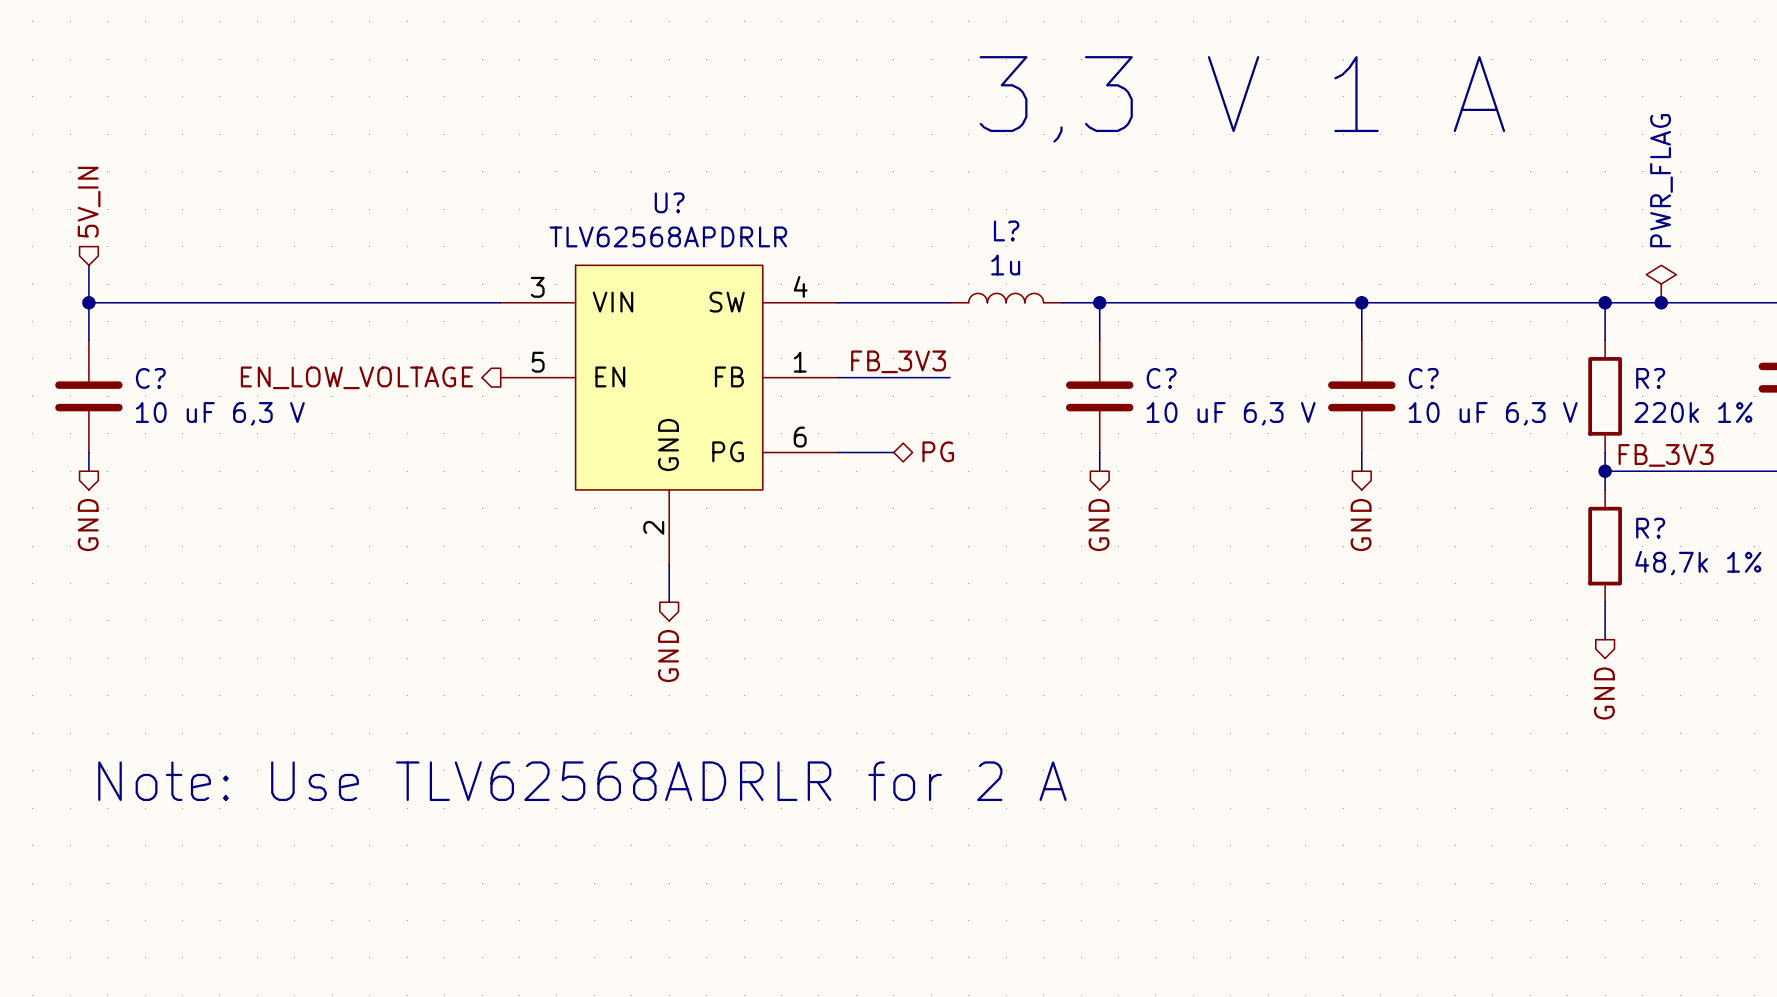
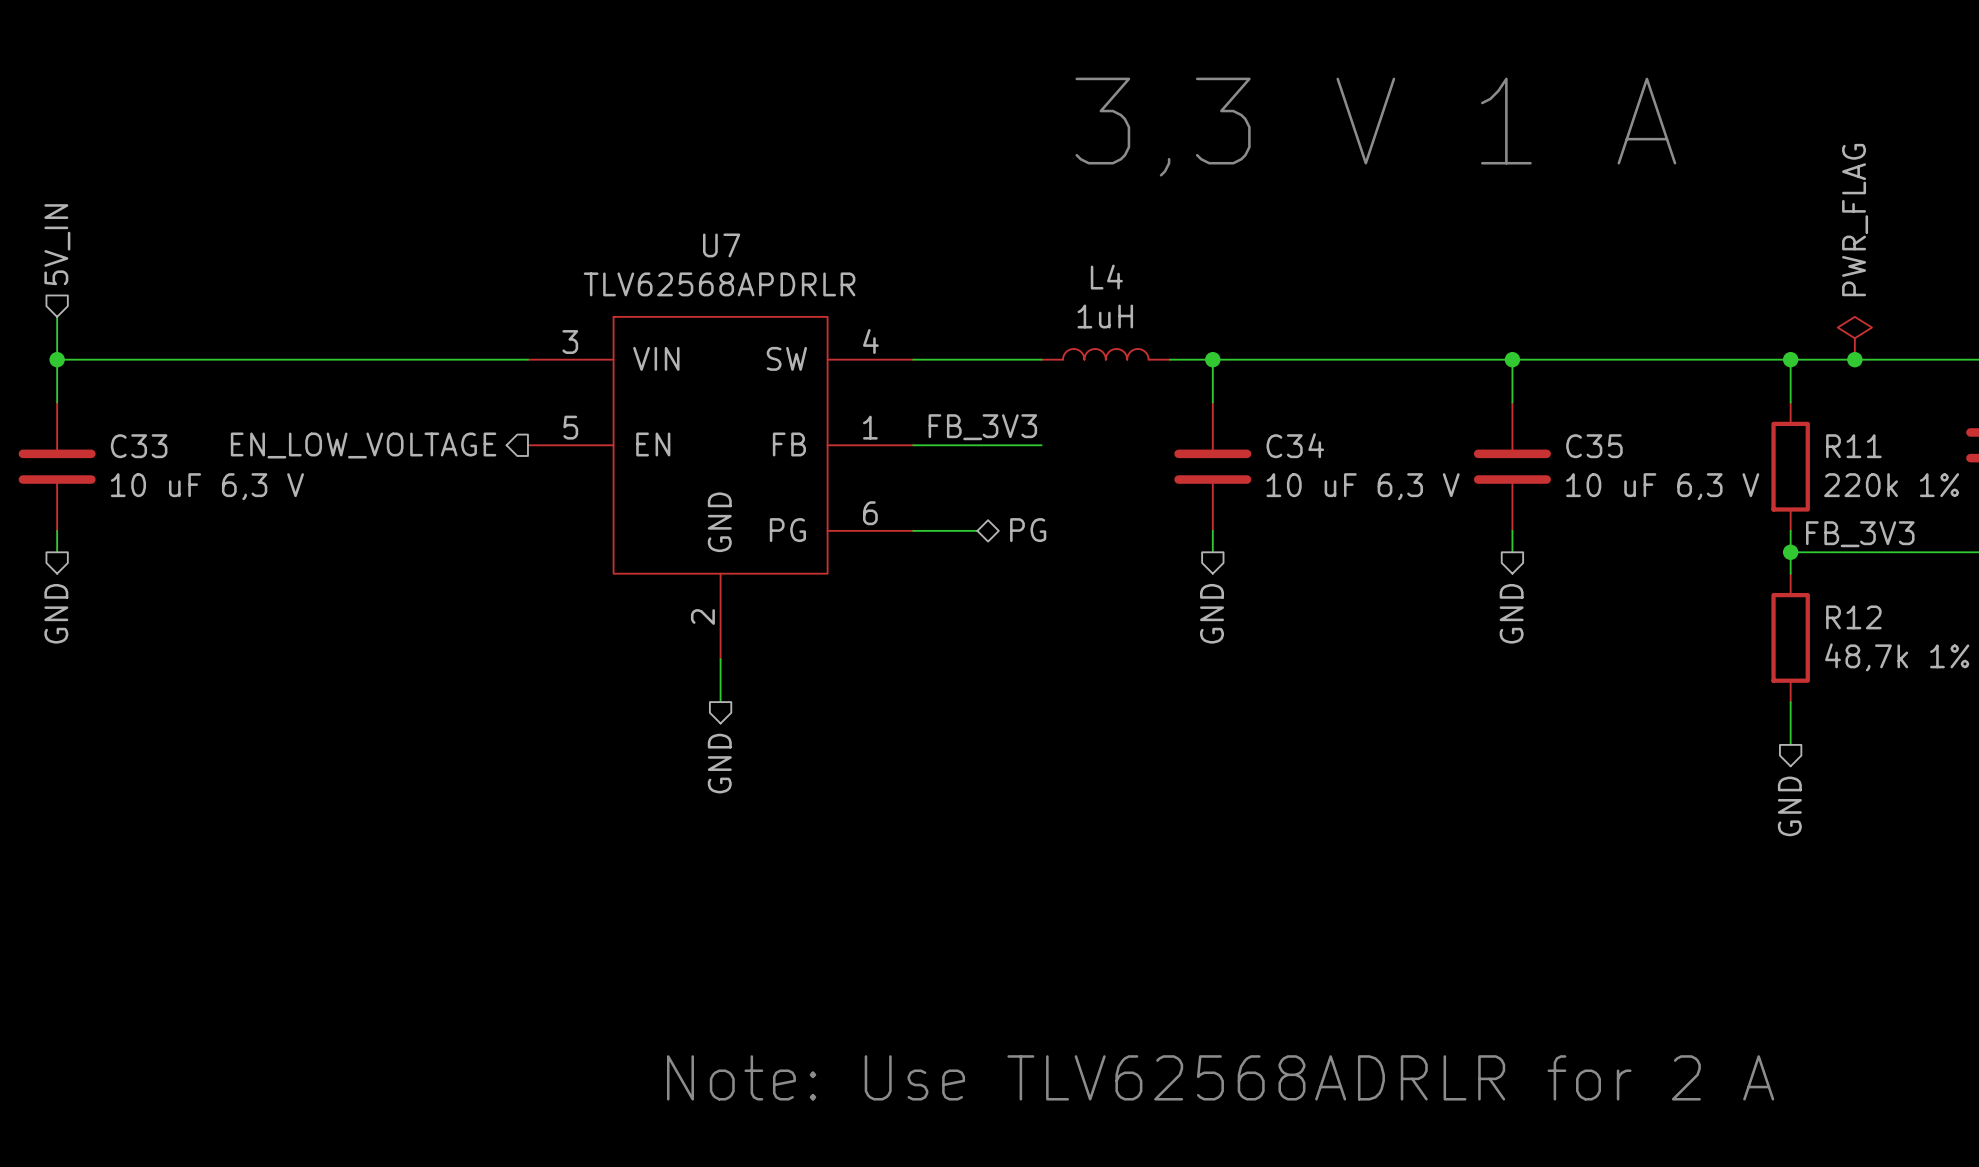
U? name: U? (669, 202) -> U7 (721, 245)
L? name: L? (1006, 230) -> L4 (1106, 277)
L? value: 1u (1005, 265) -> 1uH (1105, 316)
C? name: C? (150, 378) -> C33 (139, 446)
C? name: C? (1161, 378) -> C34 (1295, 445)
C? name: C? (1423, 378) -> C35 (1594, 446)
R? name: R? (1650, 378) -> R11 (1853, 446)
R? name: R? (1650, 528) -> R12 (1853, 617)
text: Note: Use TLV62568ADRLR for 2 A (582, 781) -> none
text: none -> Note: Use TLV62568ADRLR for 2 A (1220, 1077)

